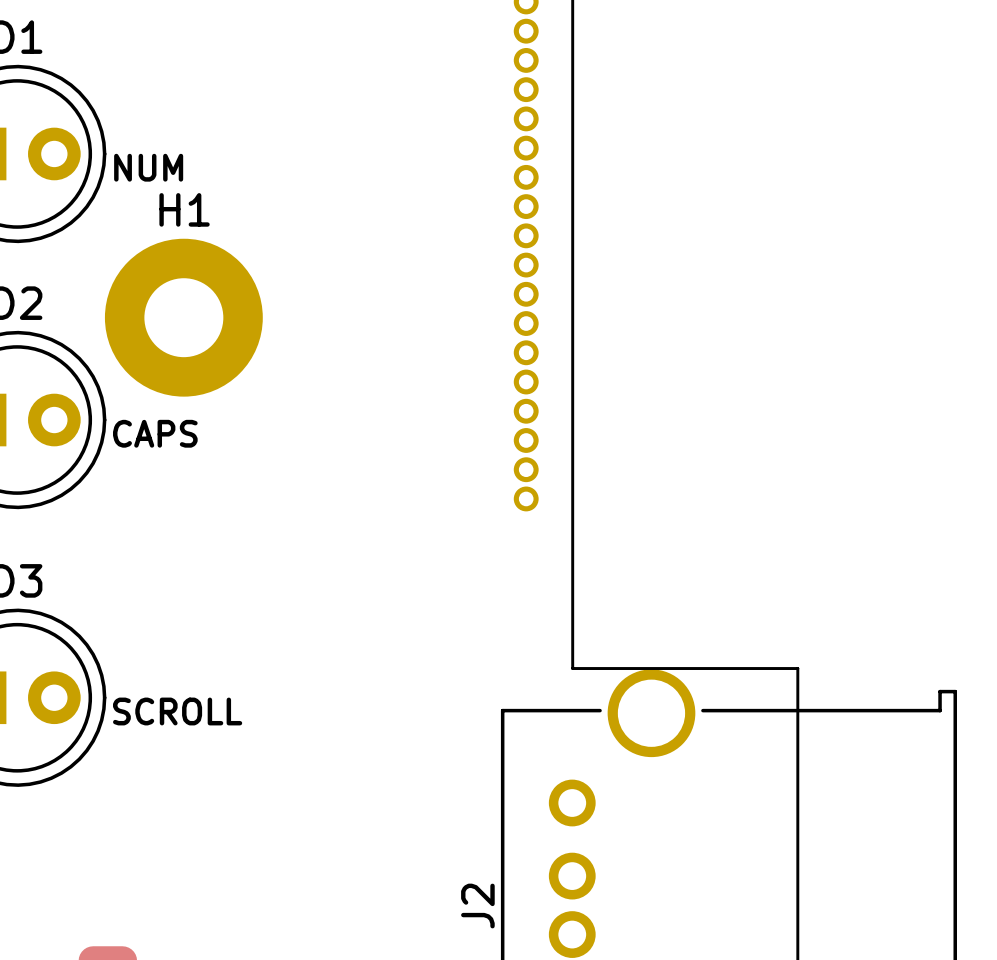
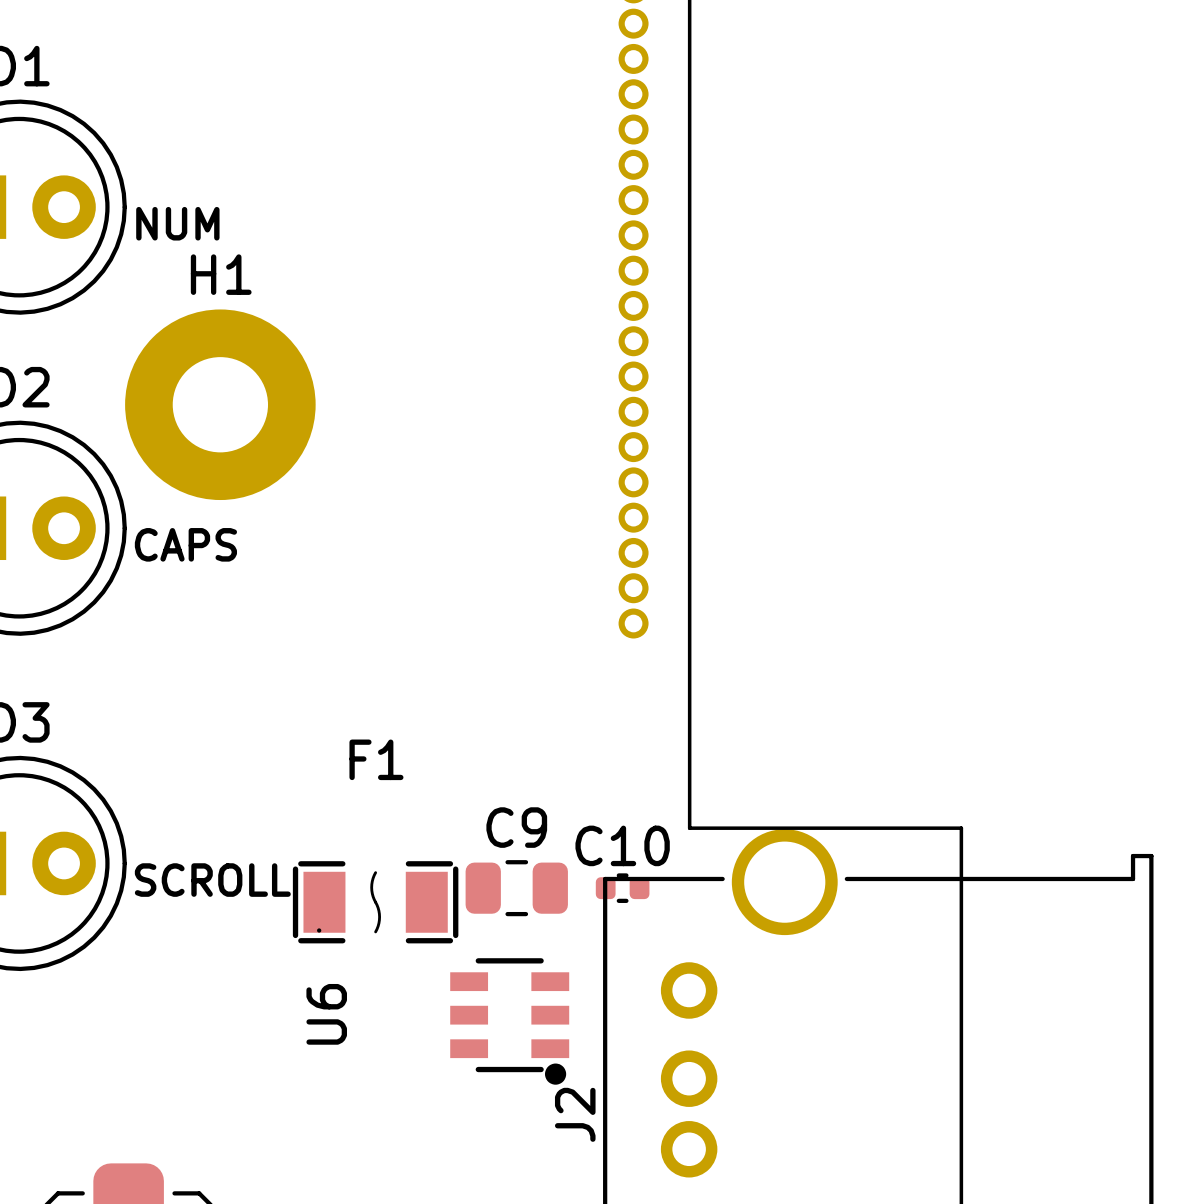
C9: none -> (516, 888)
C10: none -> (622, 888)
F1: none -> (375, 902)
U6: none -> (509, 1021)

